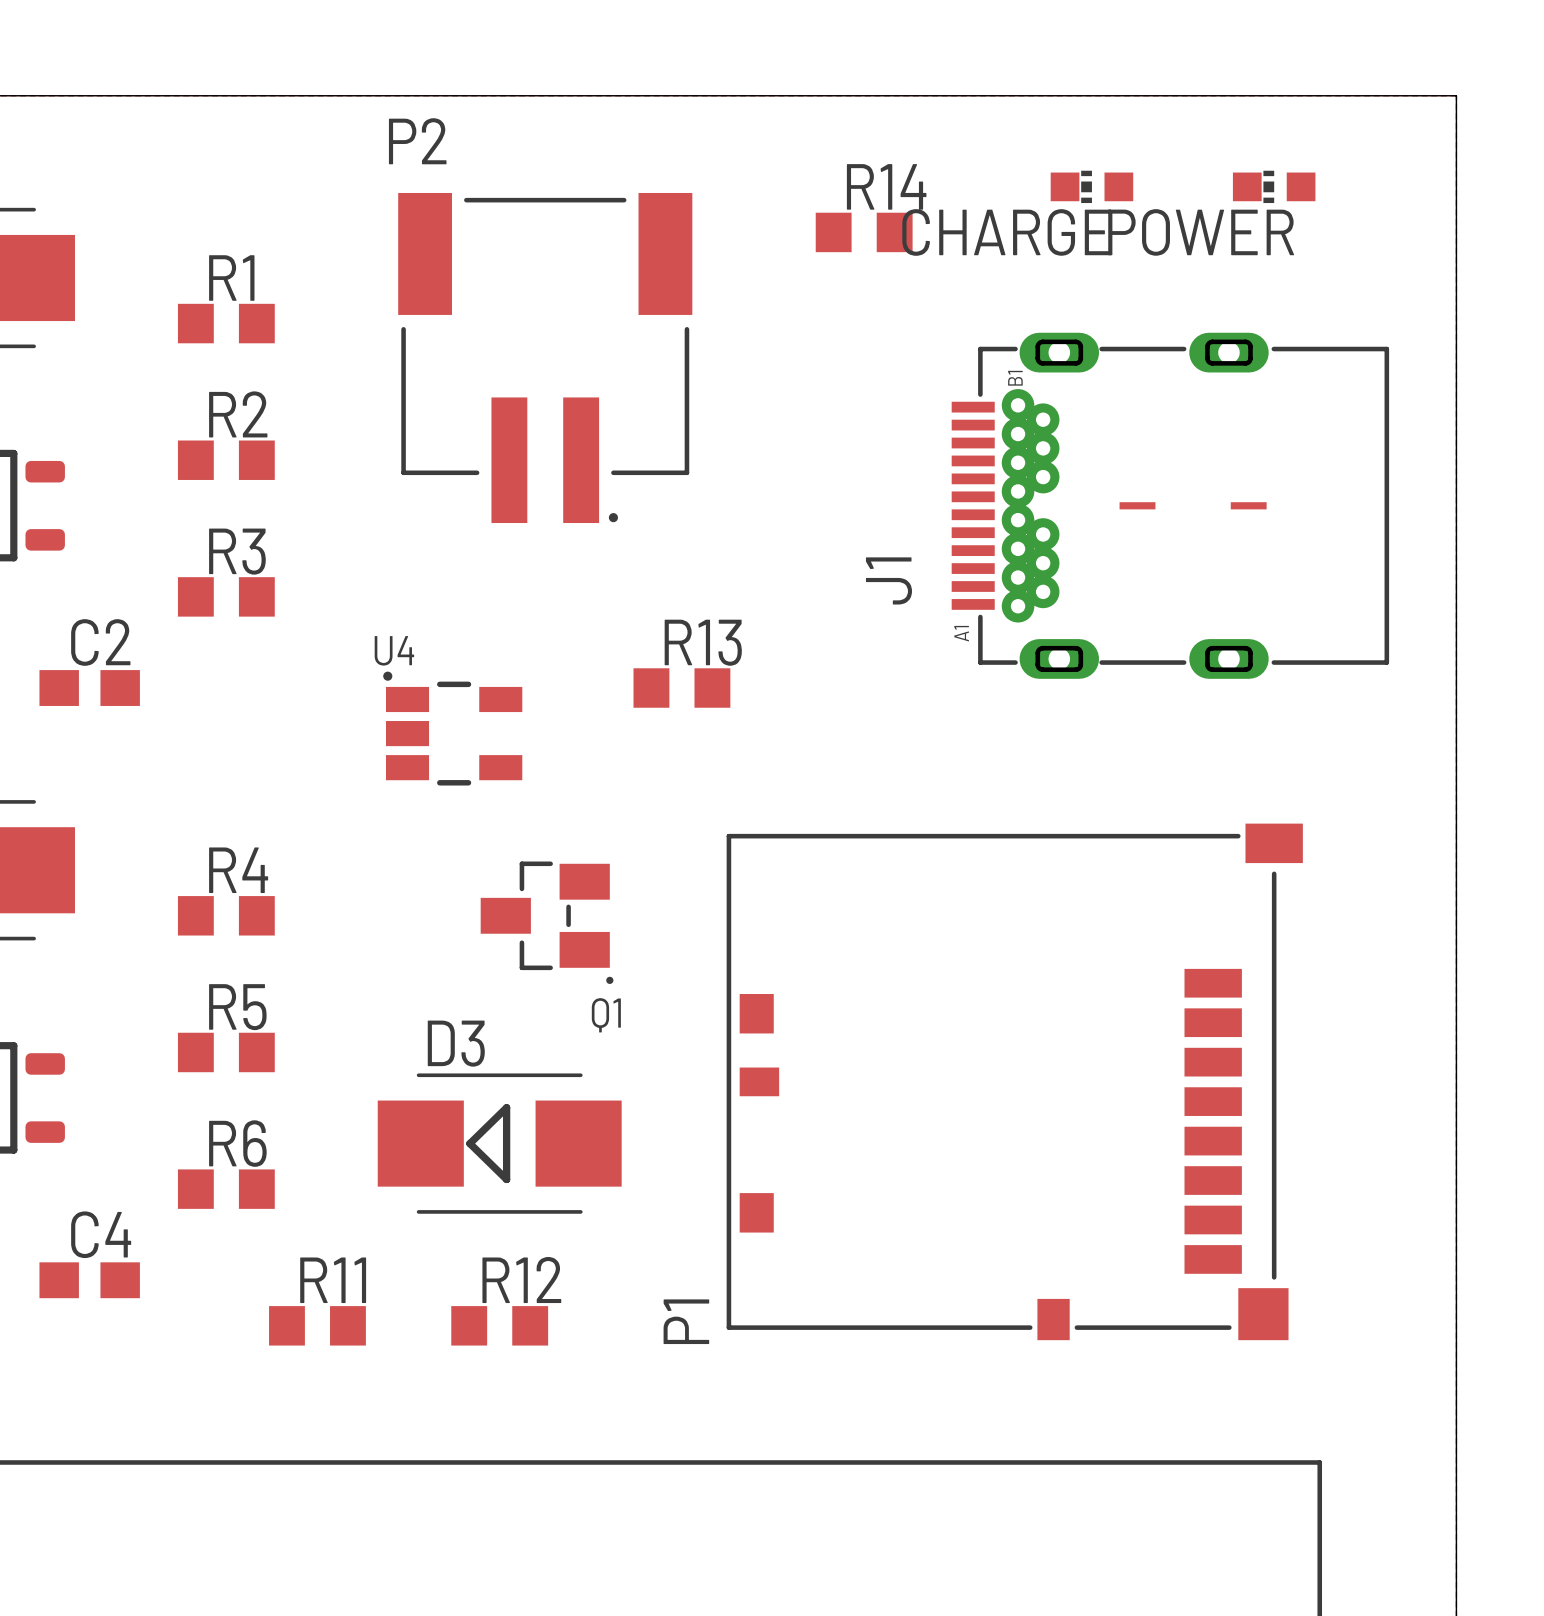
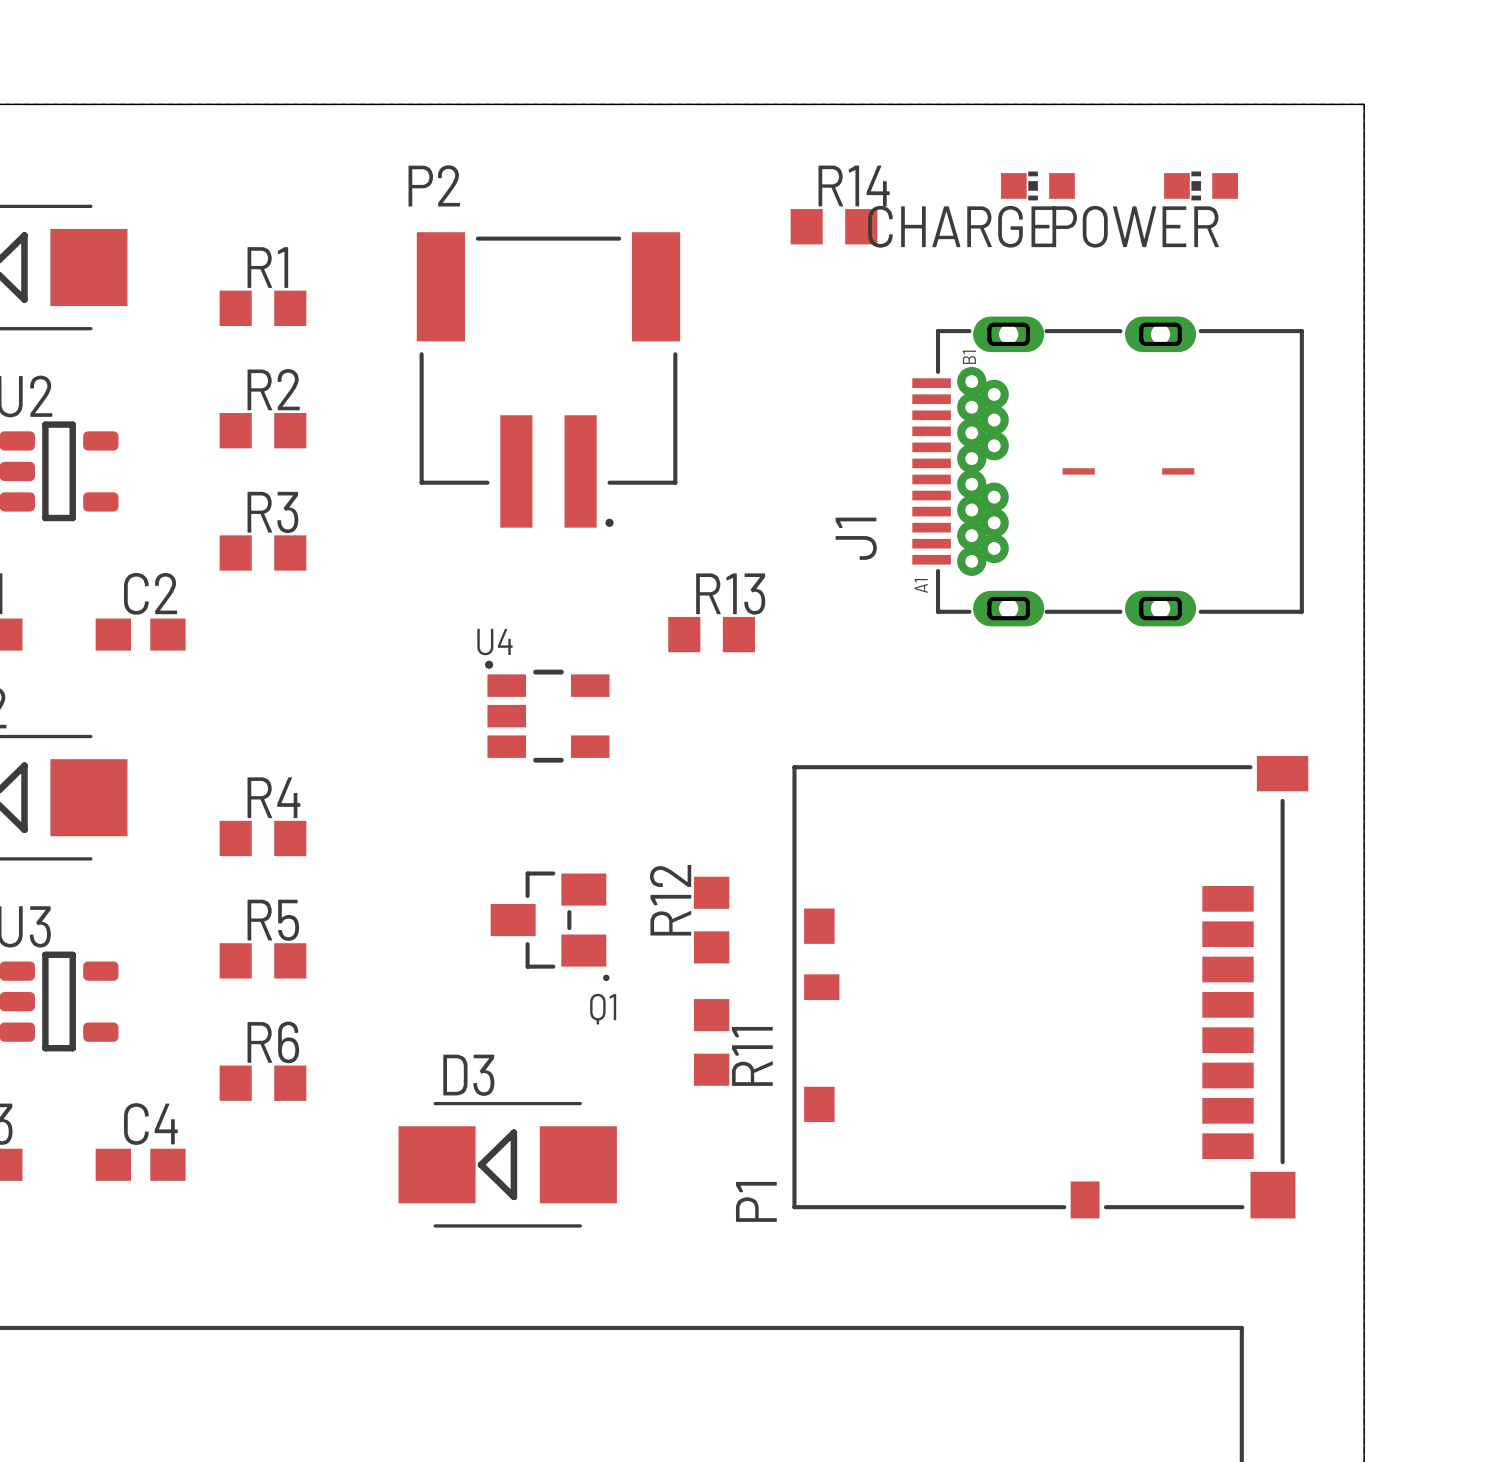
P2 position: (545, 357) -> (548, 379)
R13 position: (681, 688) -> (711, 634)
U4 position: (452, 728) -> (547, 711)
Q1 position: (547, 922) -> (550, 926)
P1 position: (1014, 1081) -> (1050, 987)
D3 position: (499, 1143) -> (507, 1164)
R12 name position: R12 (521, 1280) -> R12 (670, 900)
R11 rotation: 0° (317, 1325) -> 90° clockwise (711, 1042)
R11 position: (317, 1325) -> (711, 1042)
R12 rotation: 0° (499, 1325) -> 90° clockwise (711, 920)
R12 position: (499, 1325) -> (711, 920)

